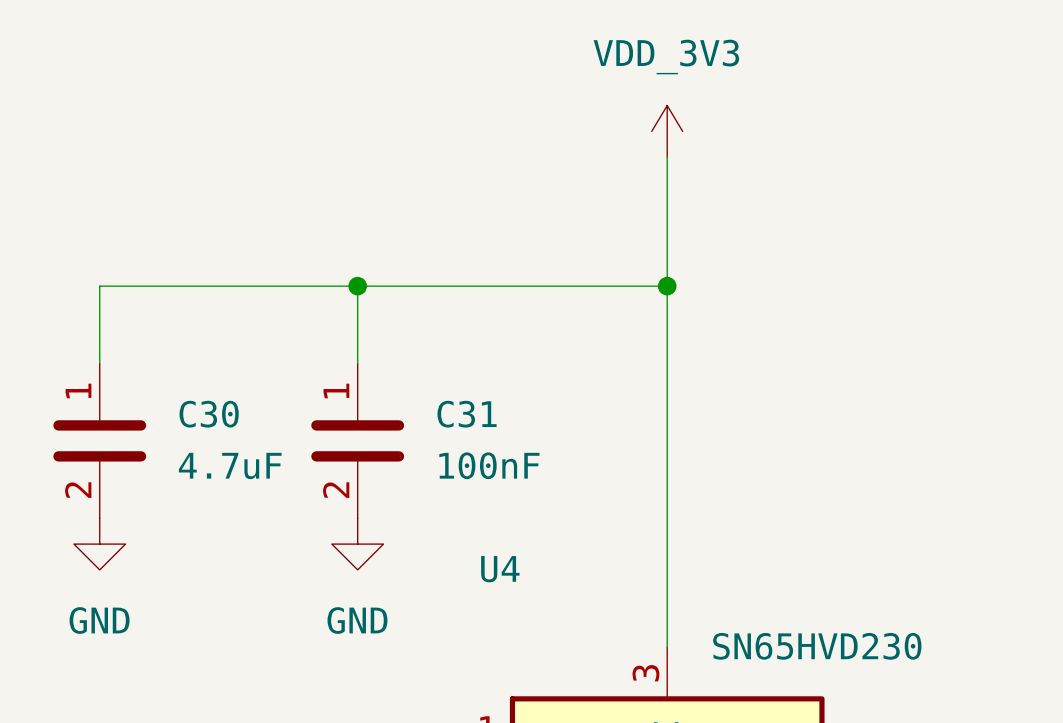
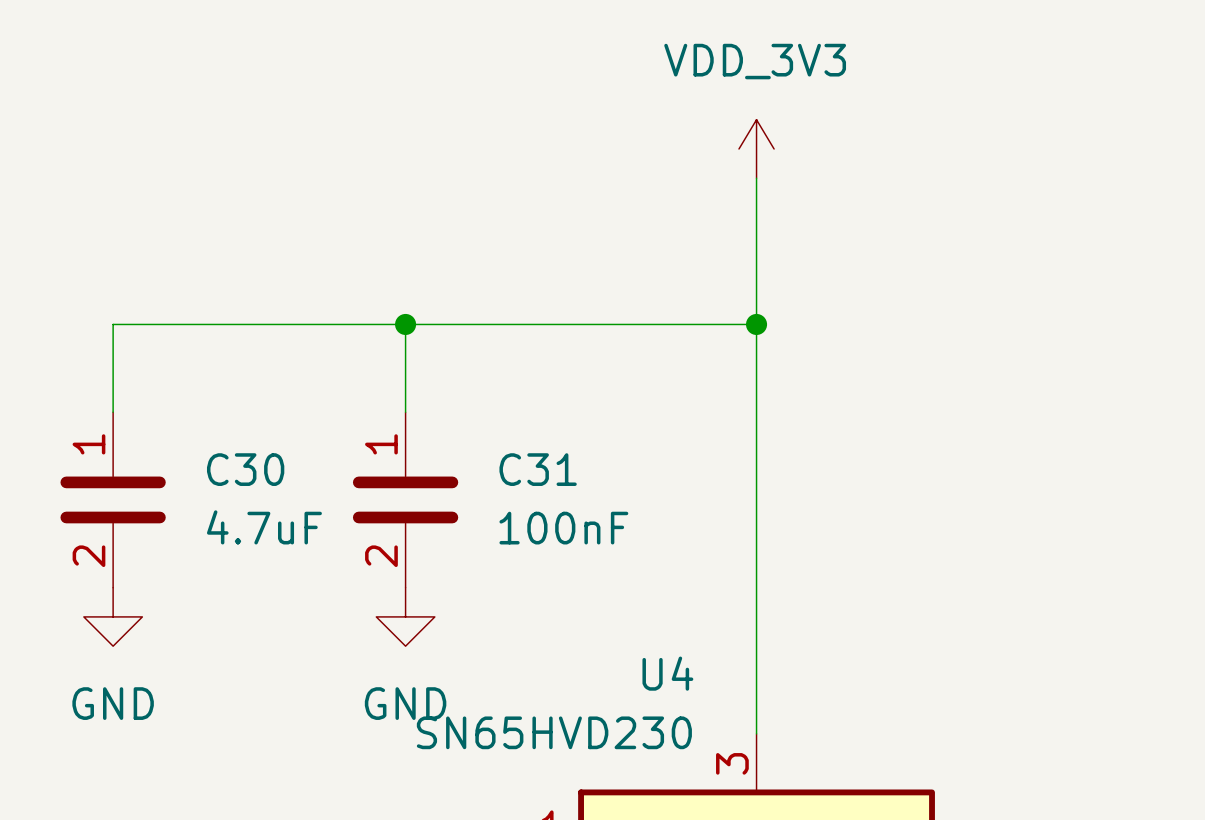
U4 name position: U4 (500, 569) -> U4 (667, 673)
U4 value position: SN65HVD230 (817, 646) -> SN65HVD230 (554, 732)

